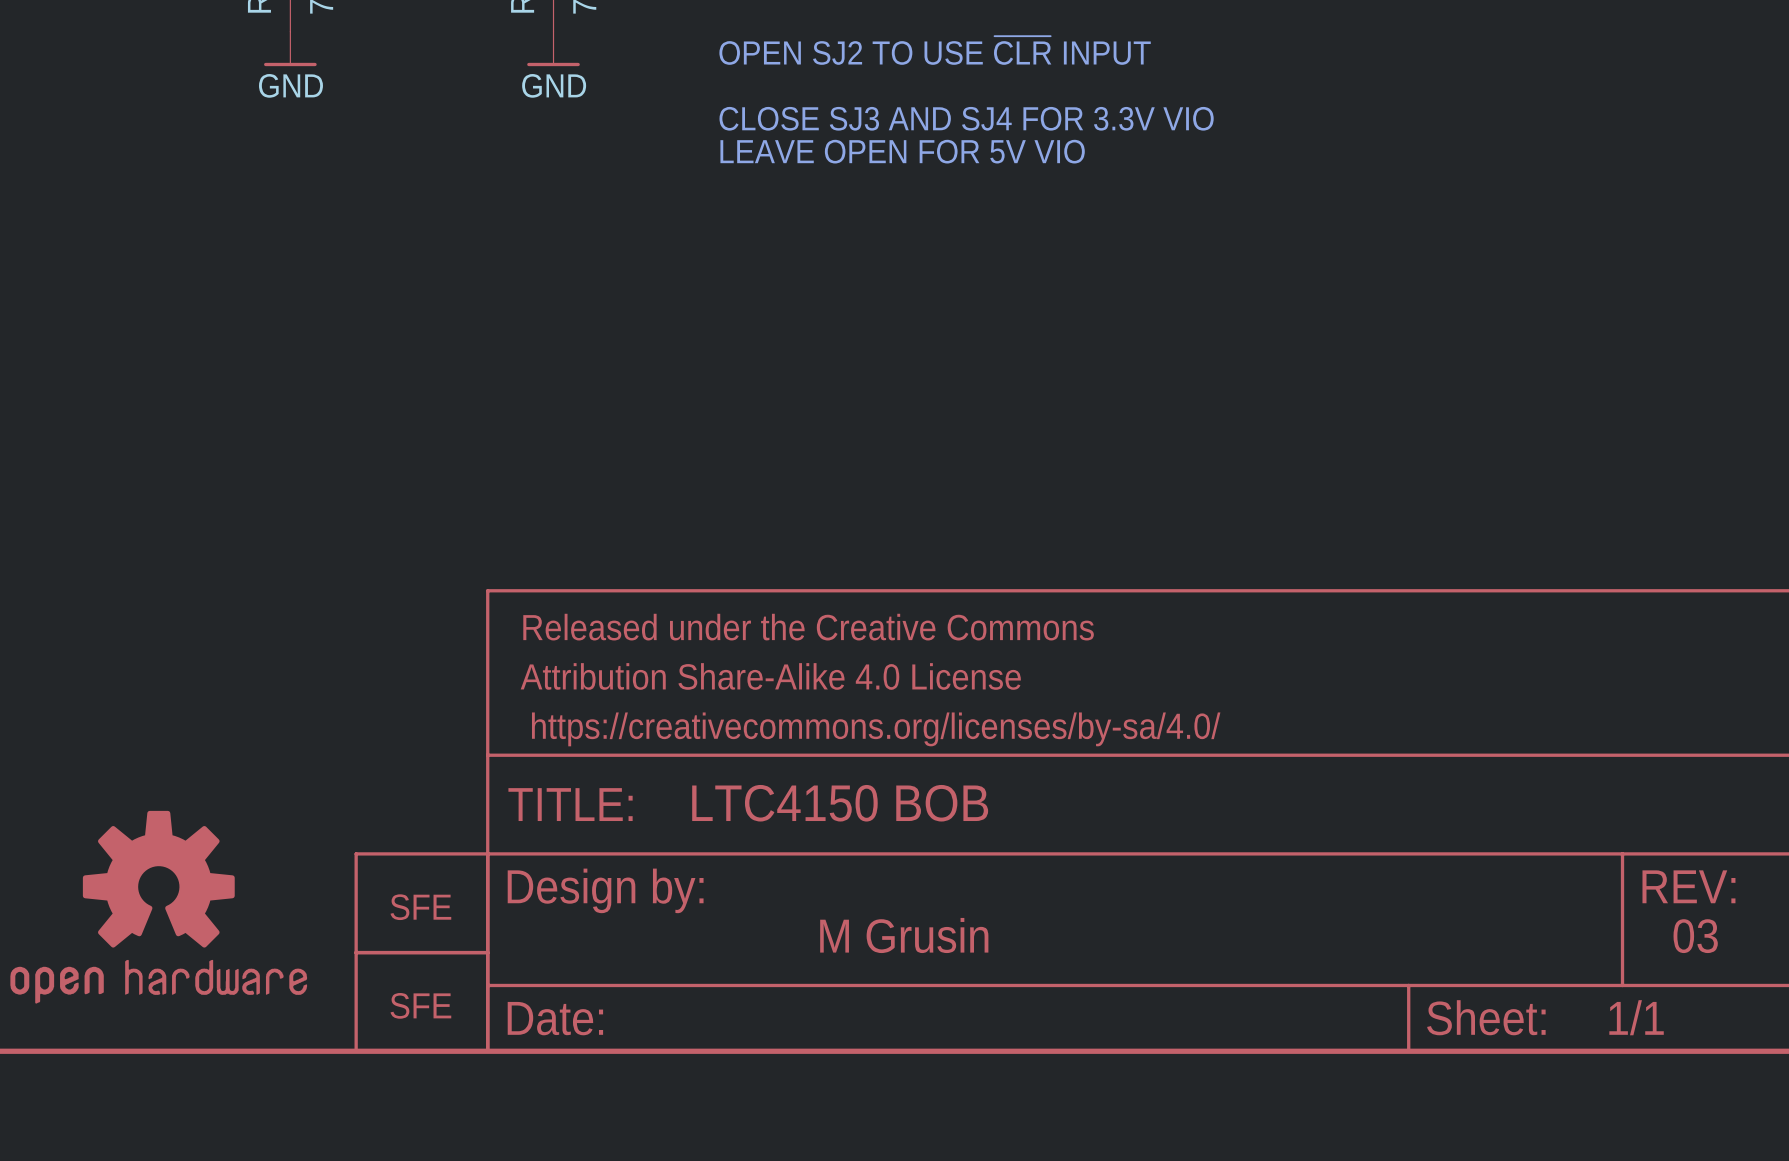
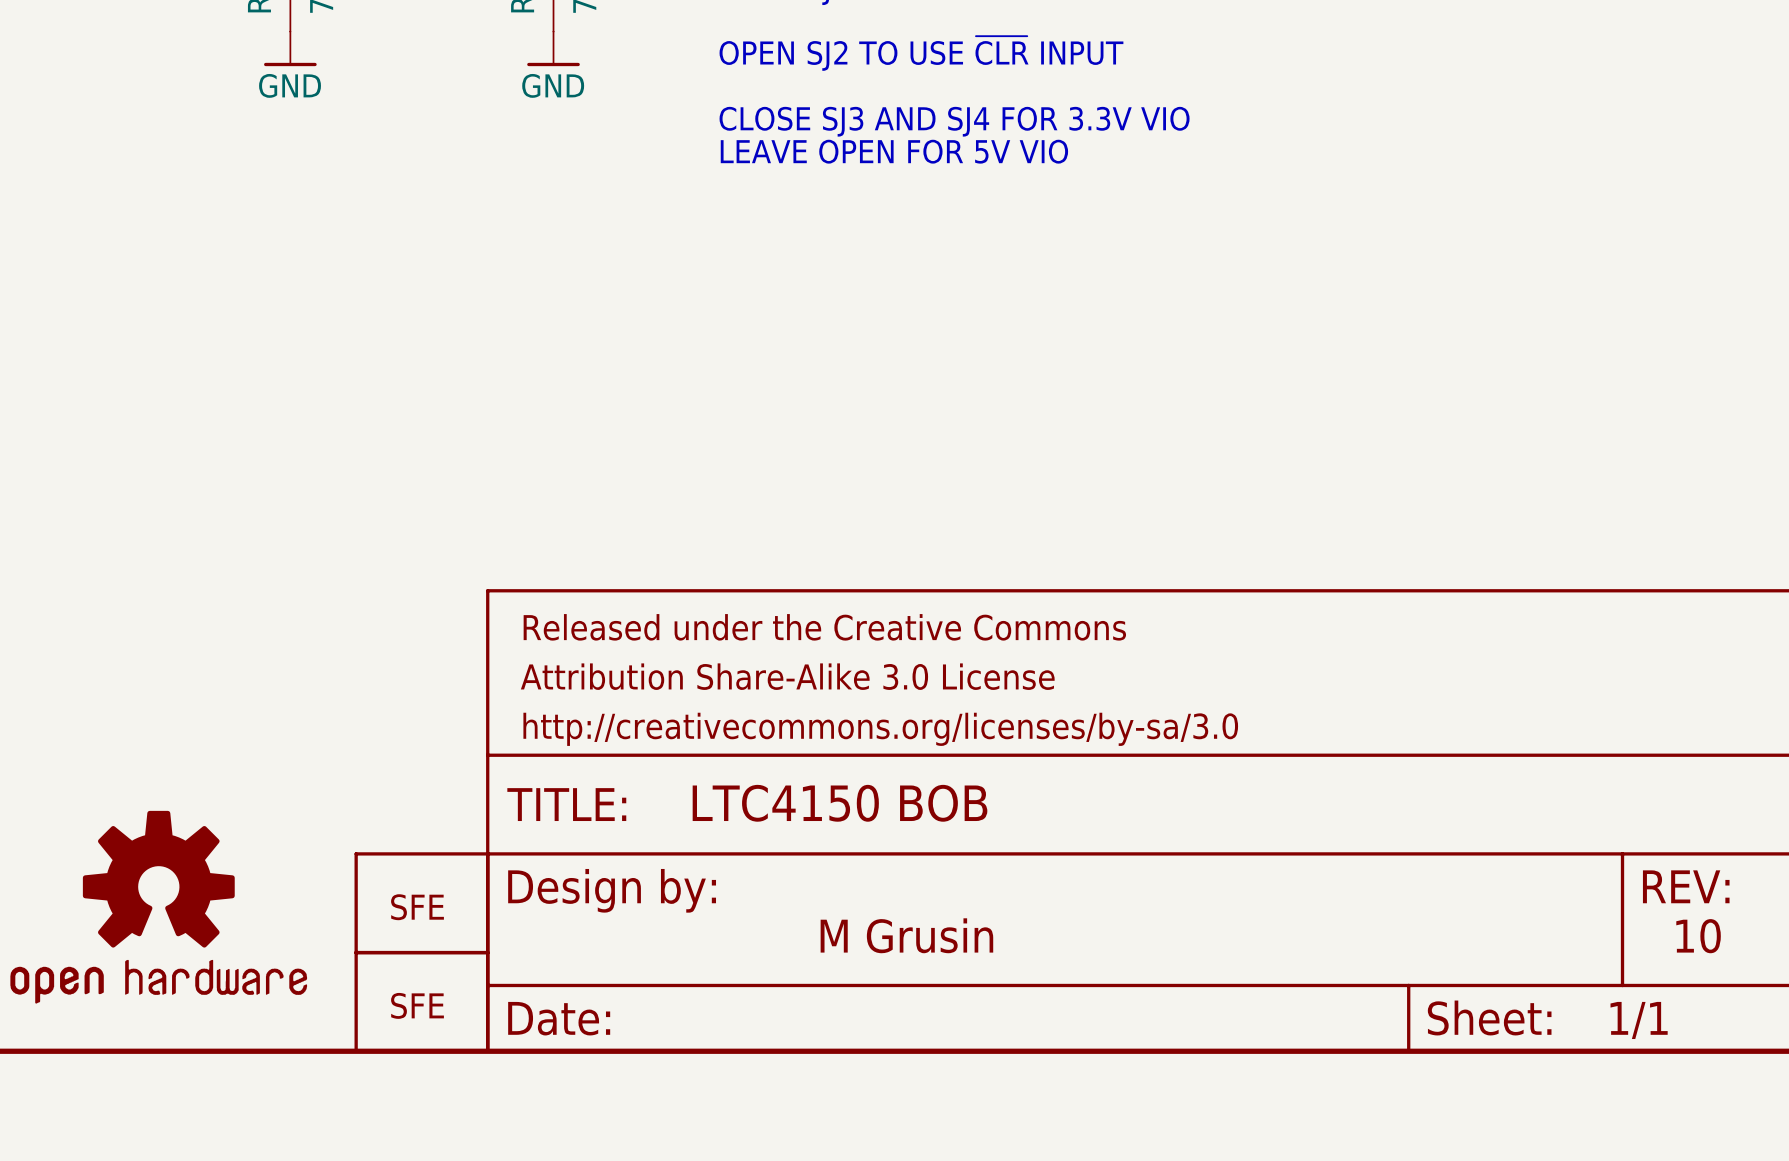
part text: Attribution Share-Alike 4.0 License (770, 676) -> Attribution Share-Alike 3.0 License (787, 676)
part text: https://creativecommons.org/licenses/by-sa/4.0/ (876, 729) -> http://creativecommons.org/licenses/by-sa/3.0 (880, 729)
text: 03 (1695, 936) -> 10 (1698, 936)

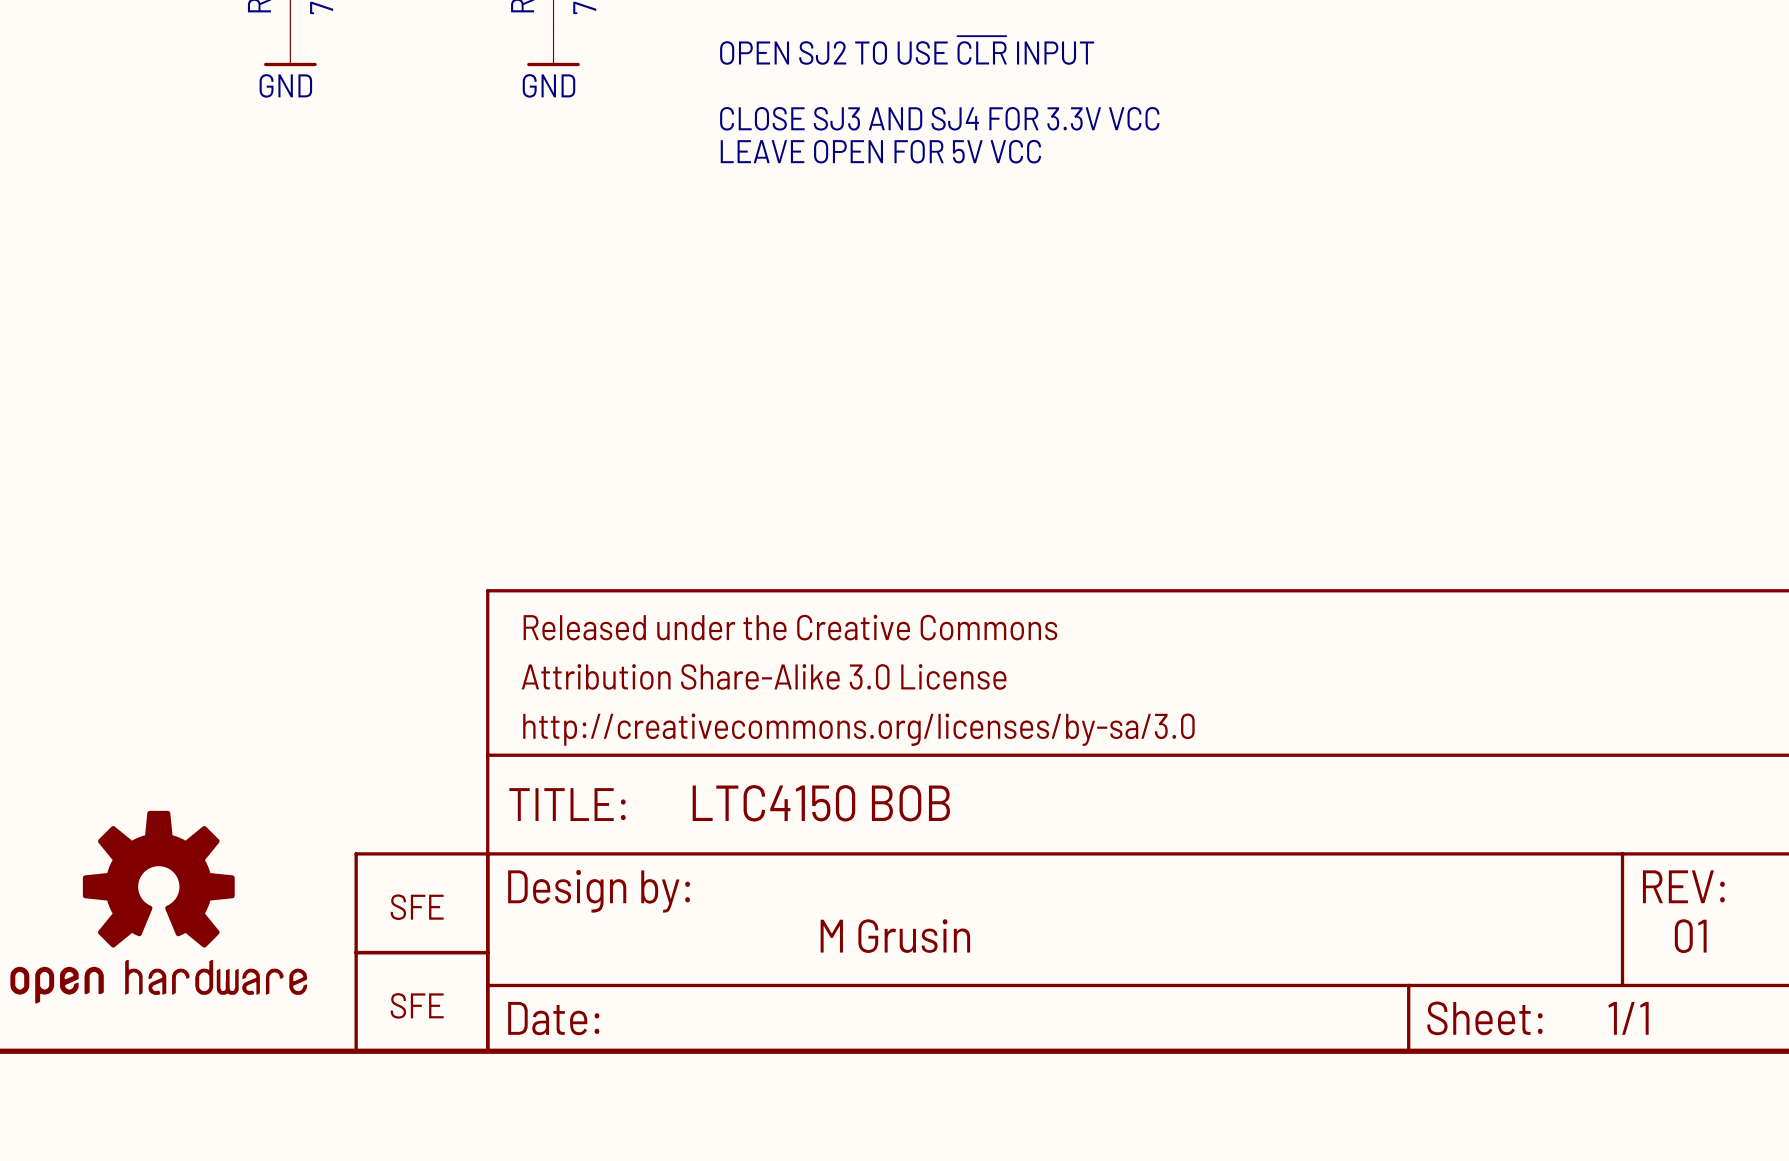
text: CLOSE SJ3 AND SJ4 FOR 3.3V VIO (954, 121) -> CLOSE SJ3 AND SJ4 FOR 3.3V VCC (939, 118)
text: LEAVE OPEN FOR 5V VIO (894, 151) -> LEAVE OPEN FOR 5V VCC (880, 151)
text: 10 (1698, 936) -> 01 (1690, 936)

